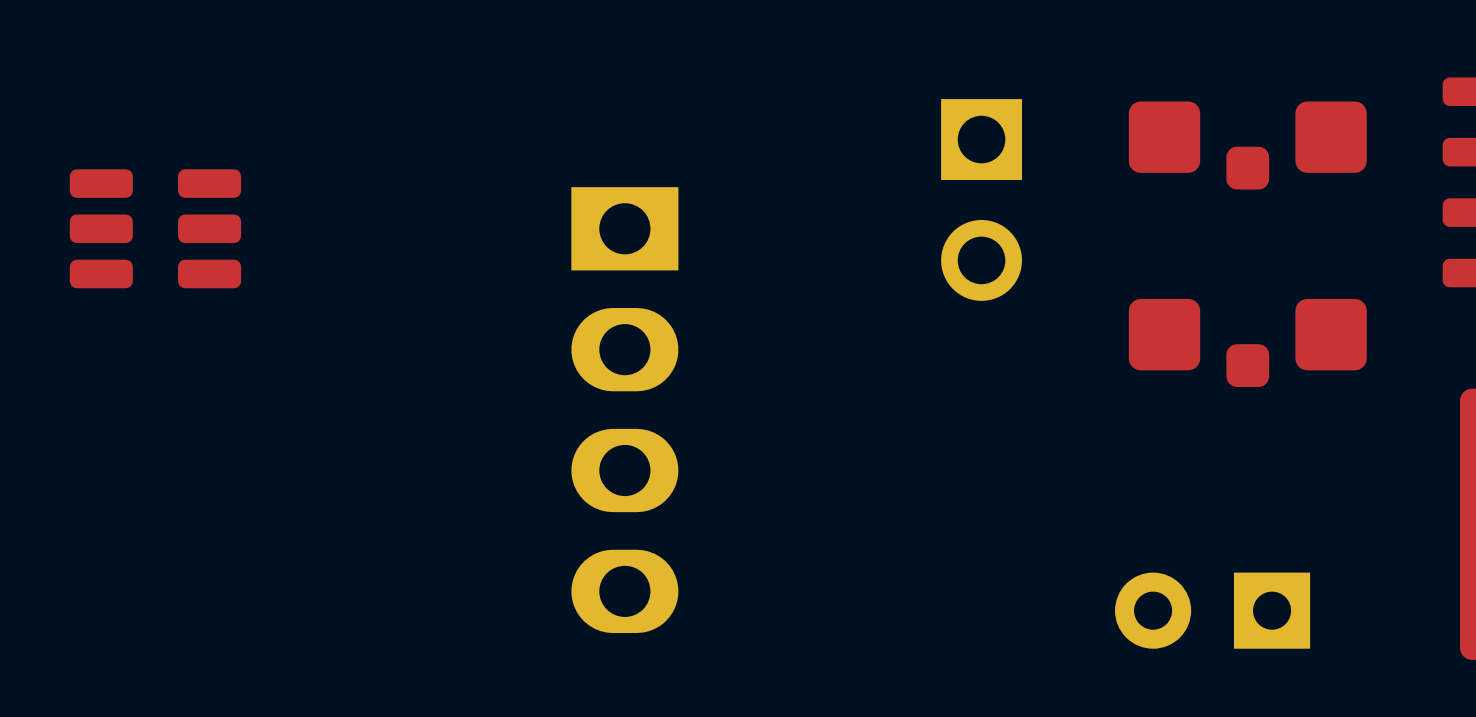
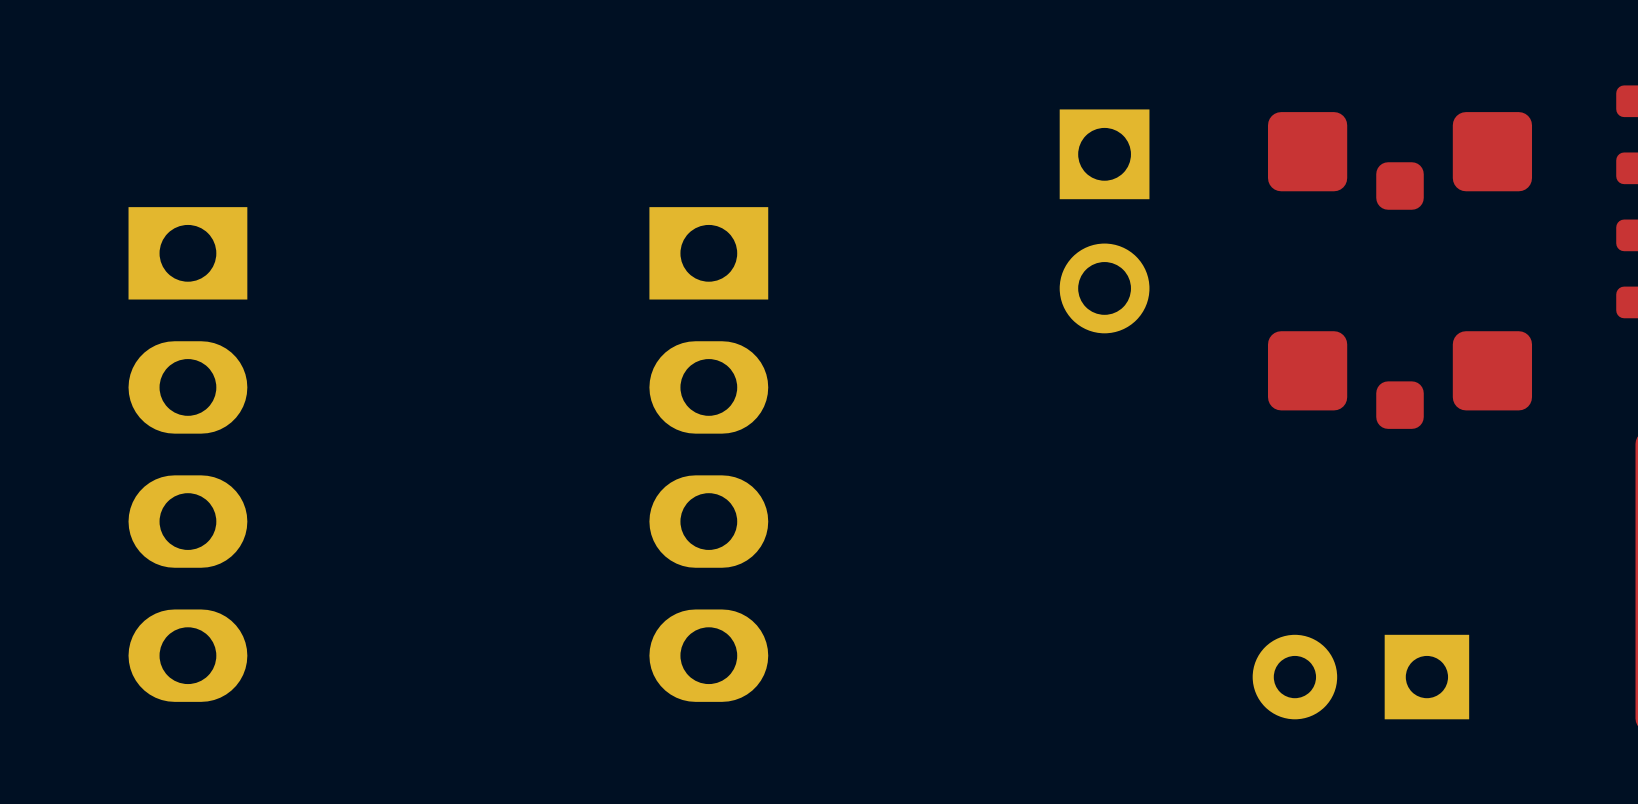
part: (155, 228) -> none
part: none -> (187, 454)

